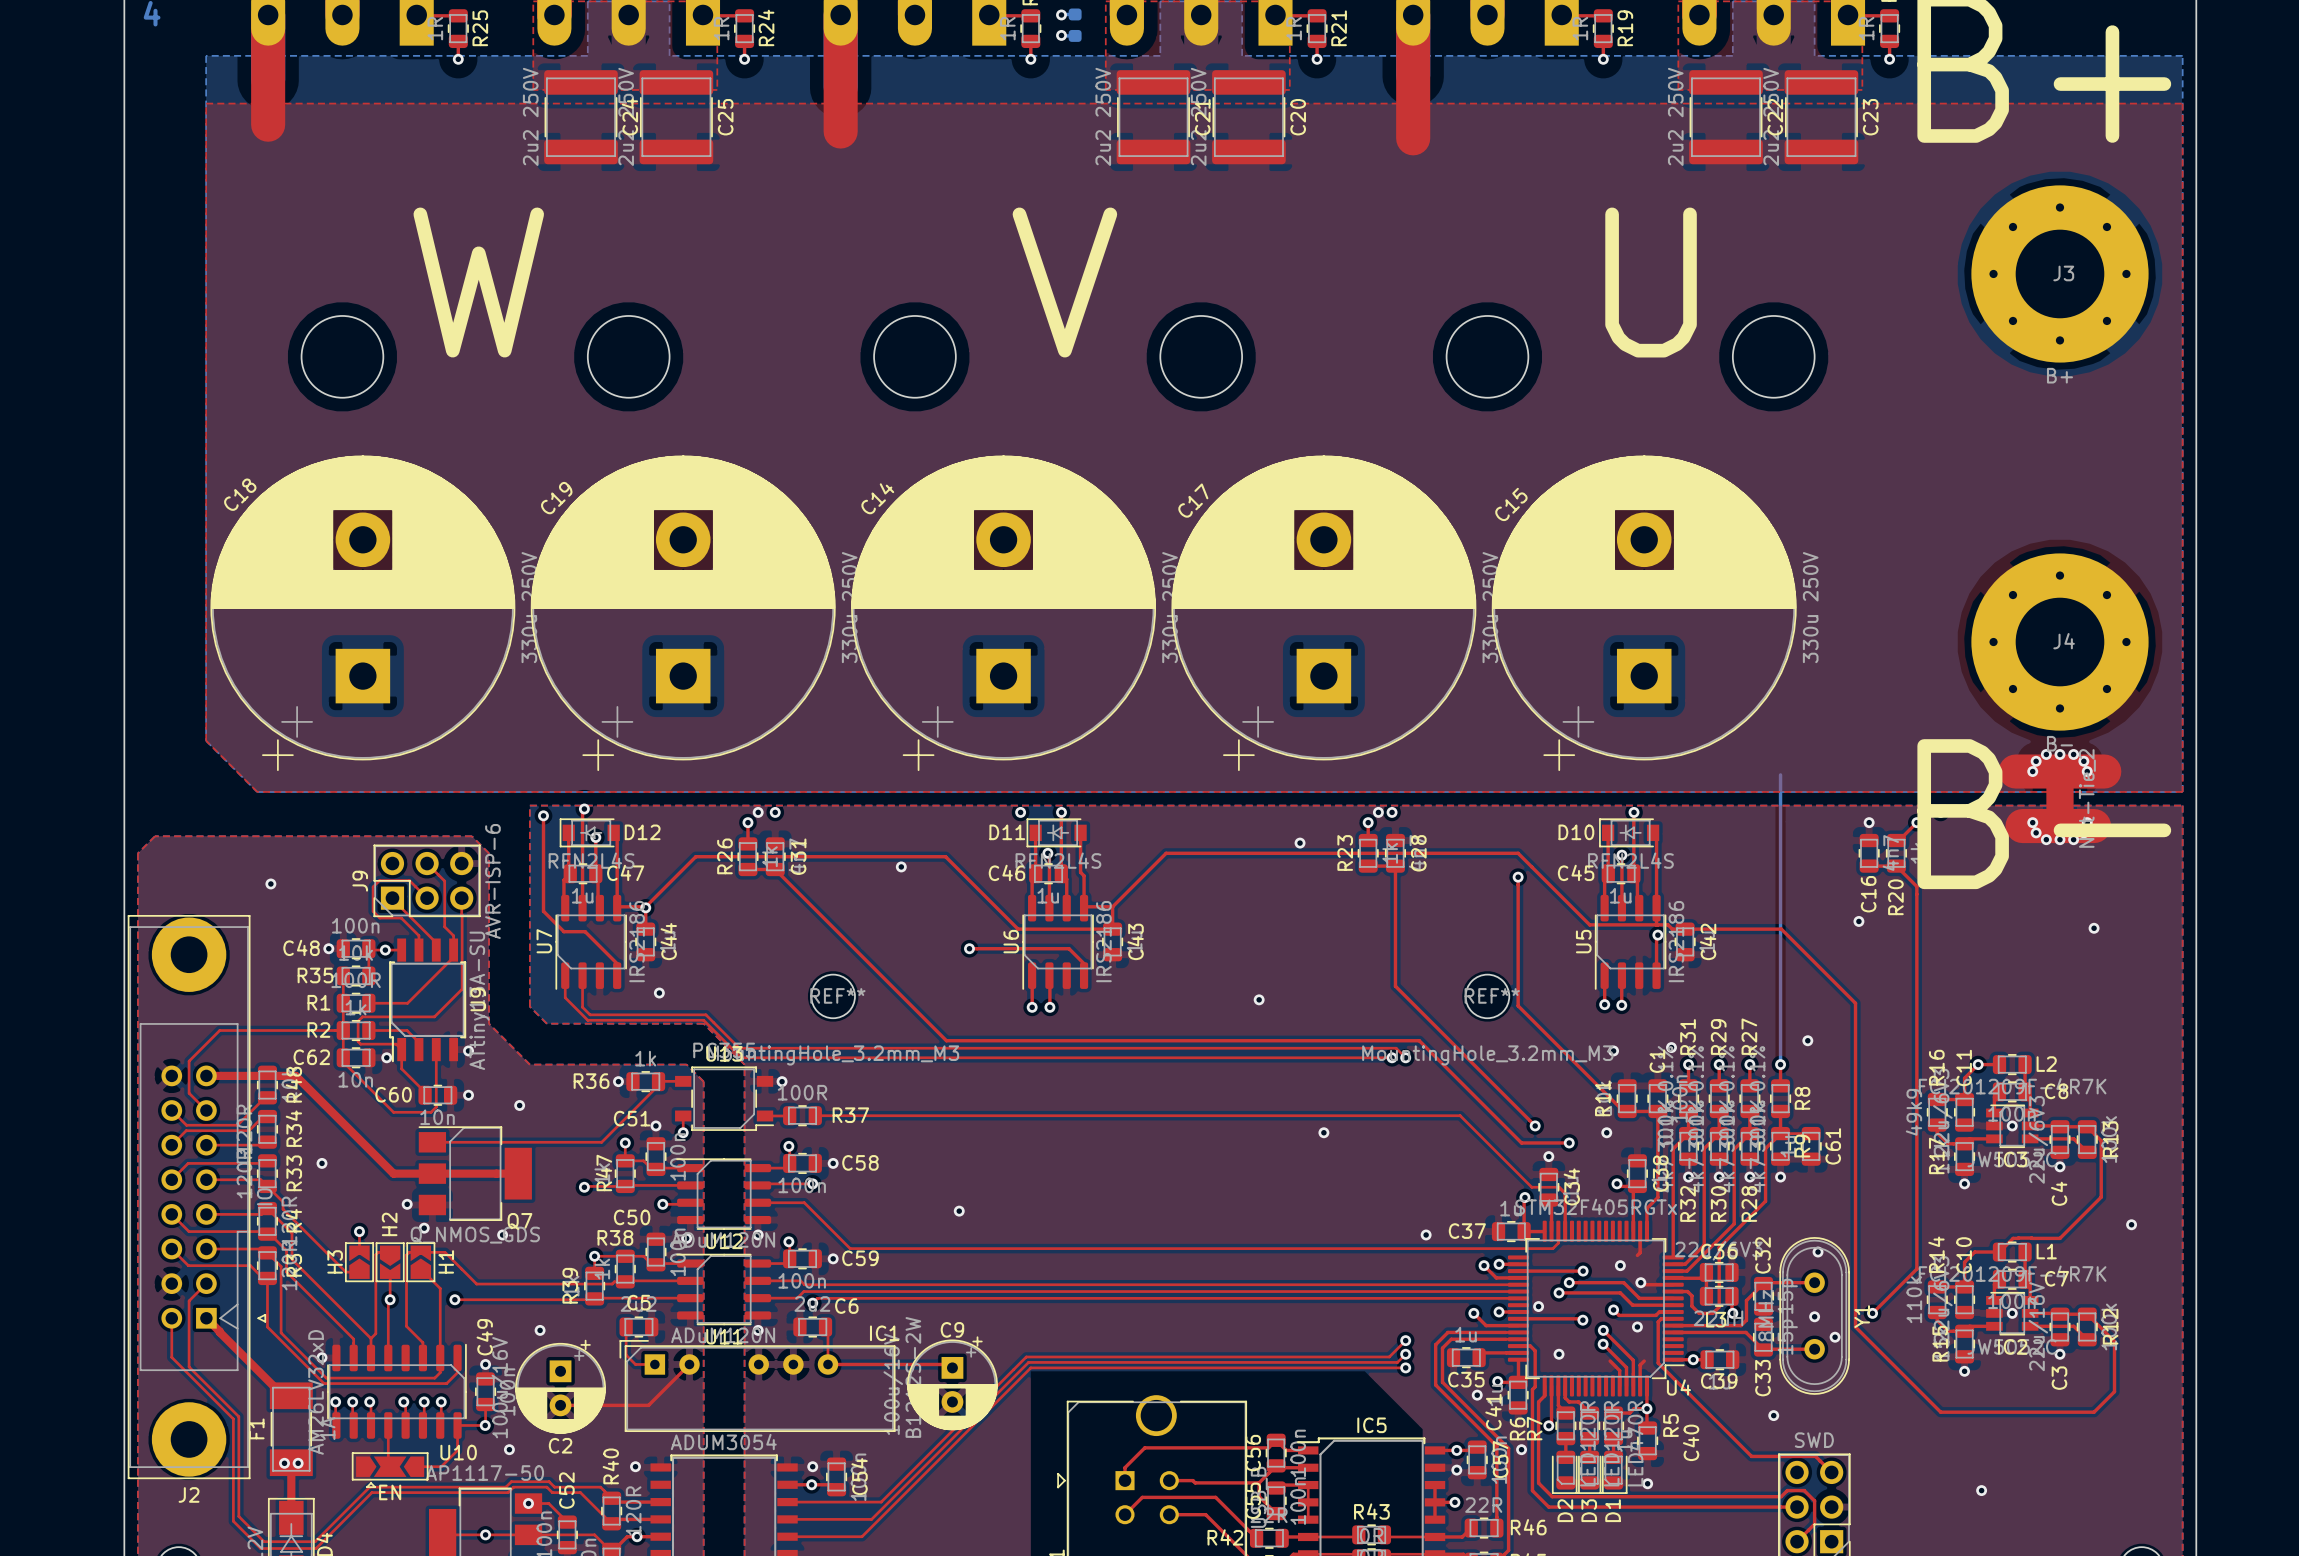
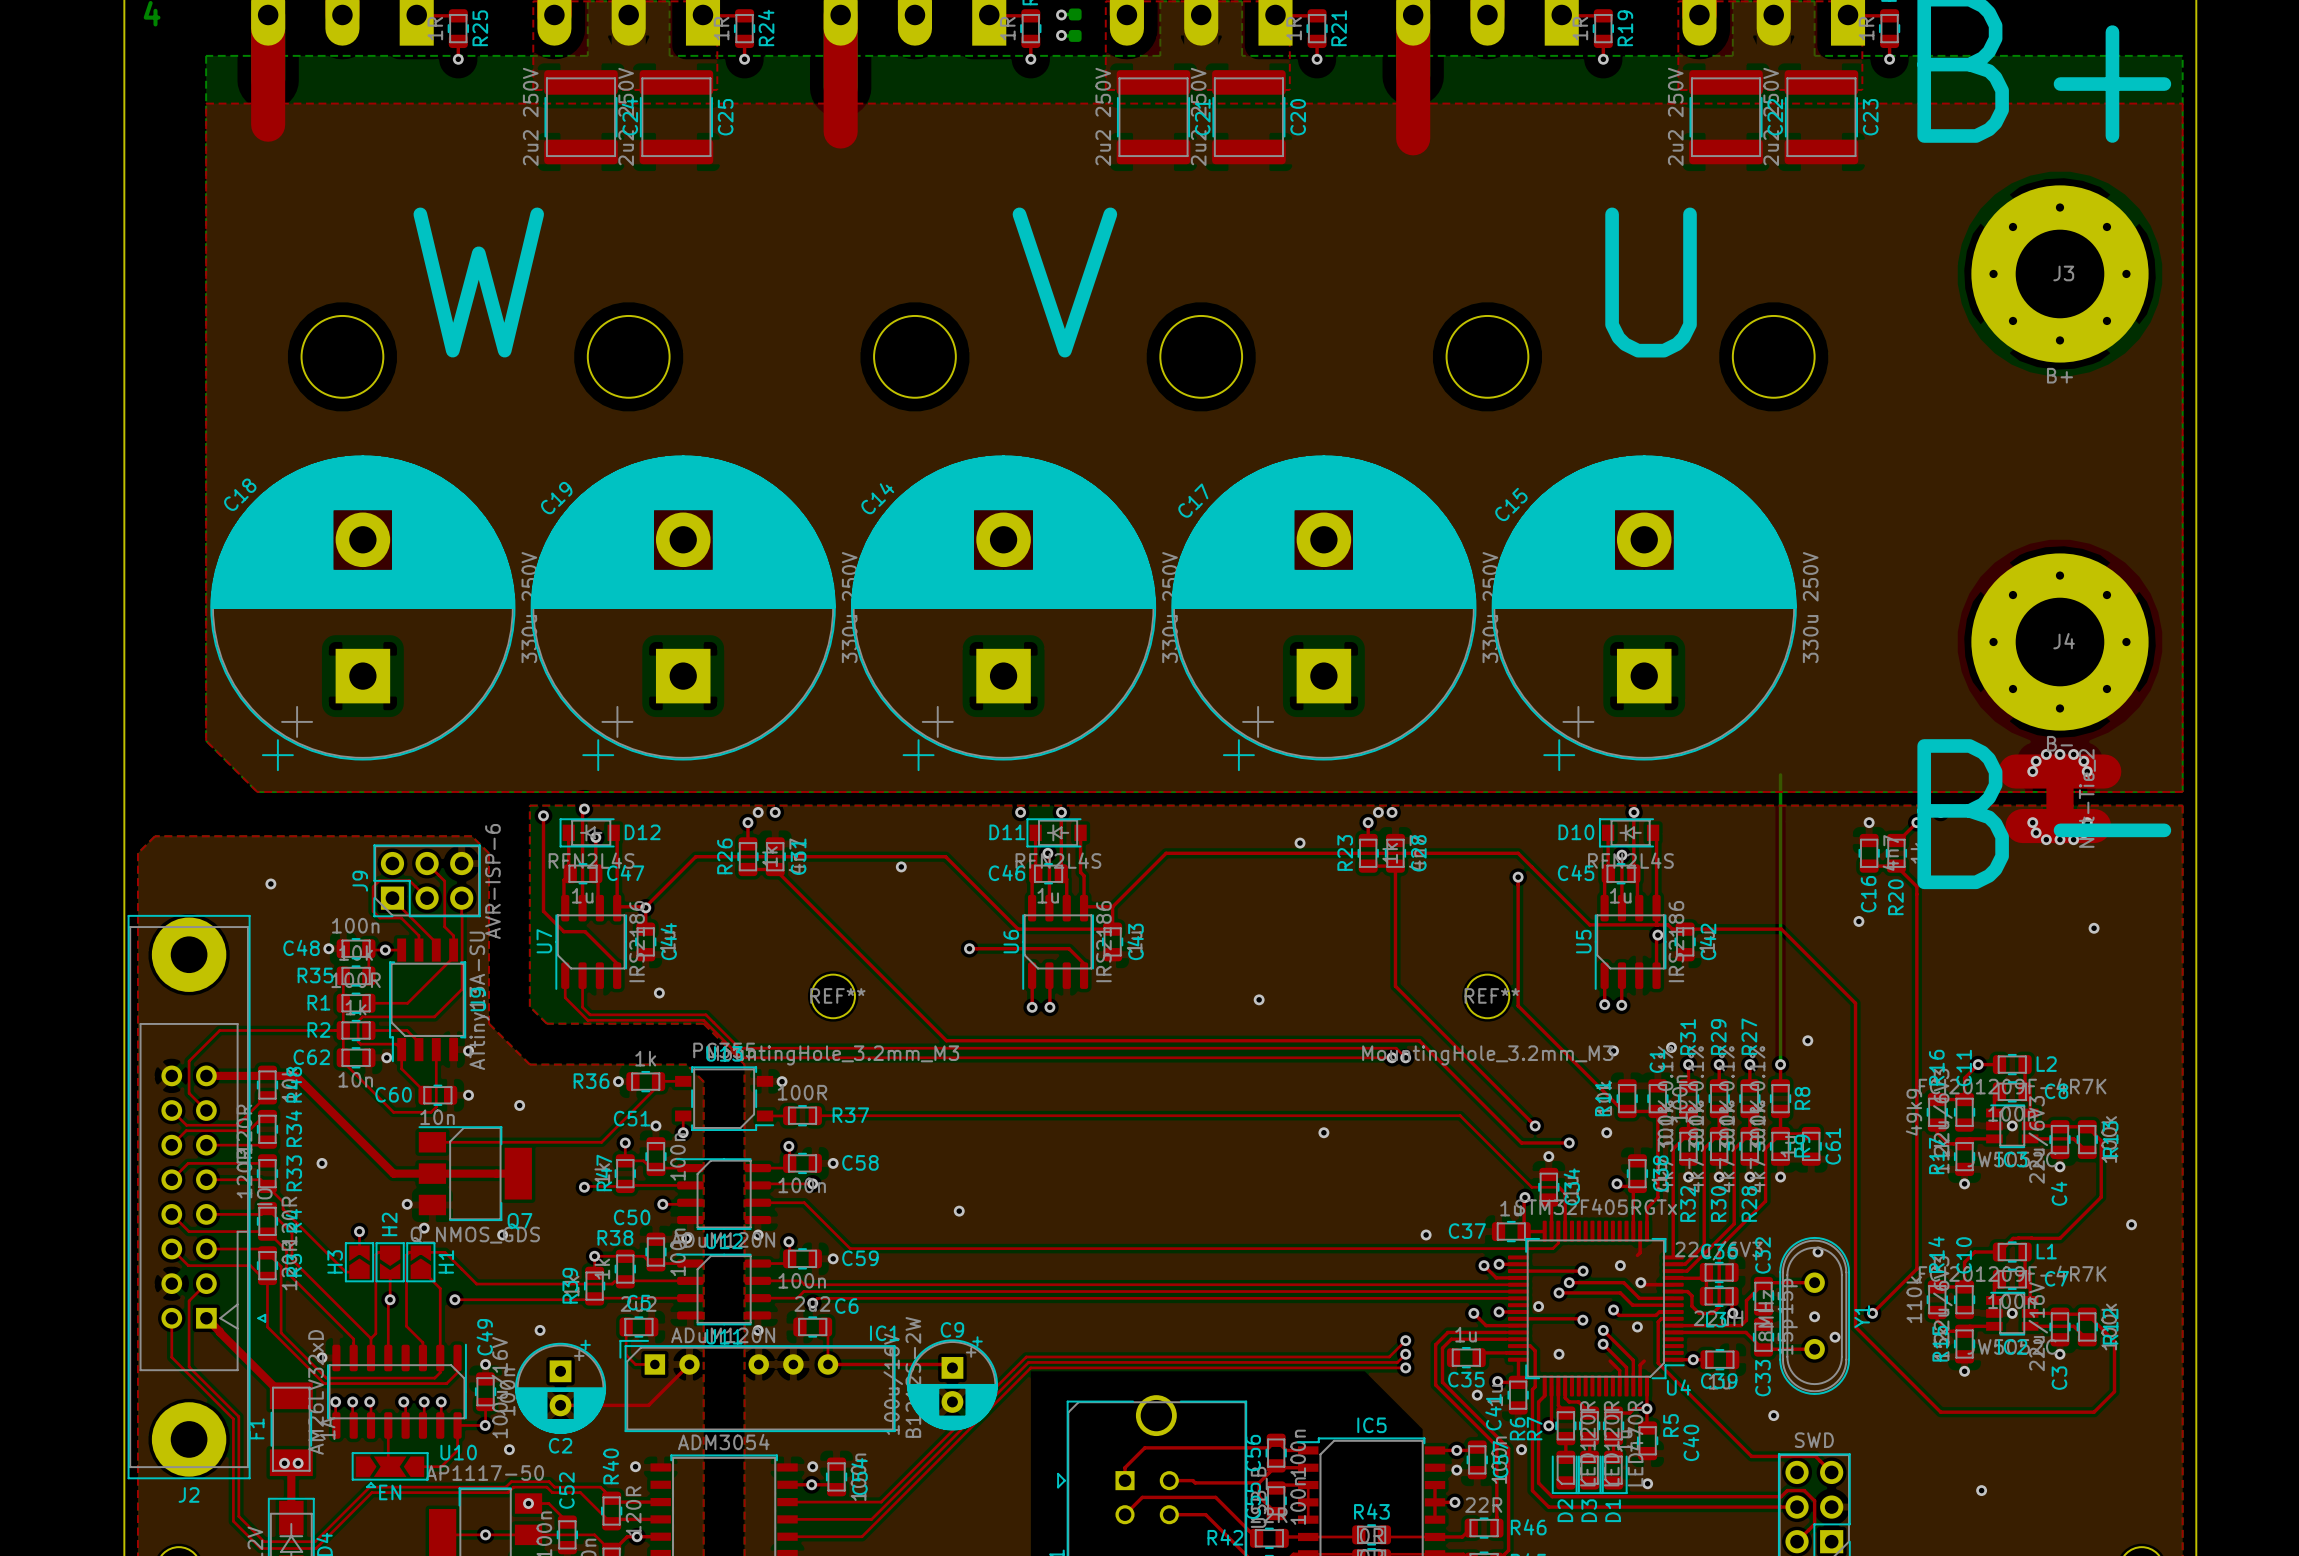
part value: ADUM3054 (723, 1442) -> ADM3054 (723, 1442)

